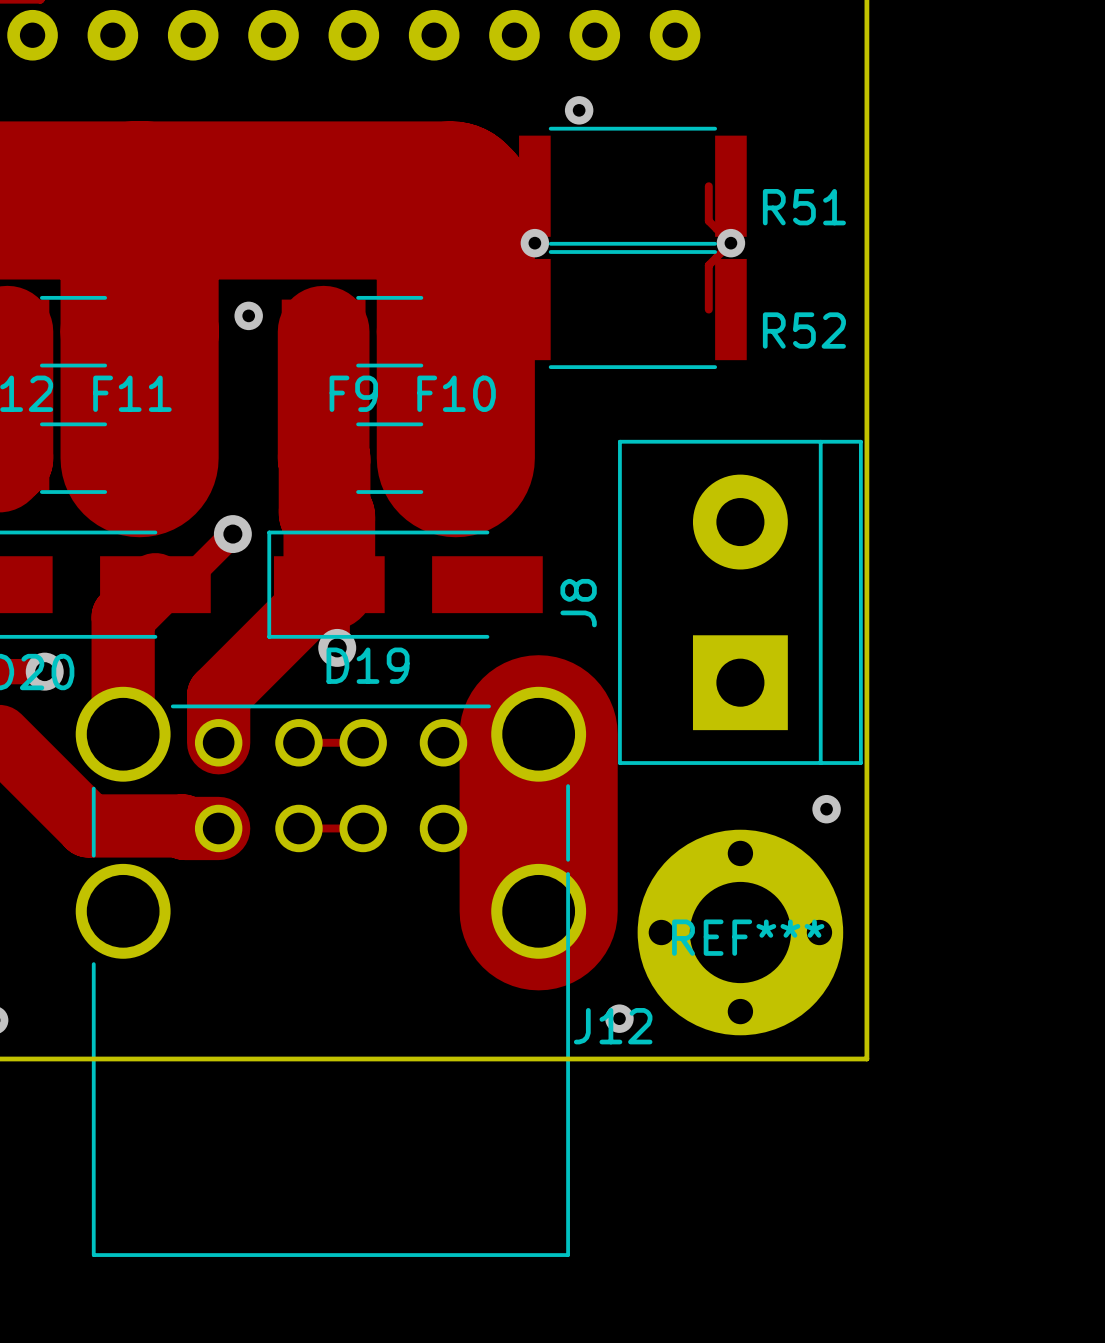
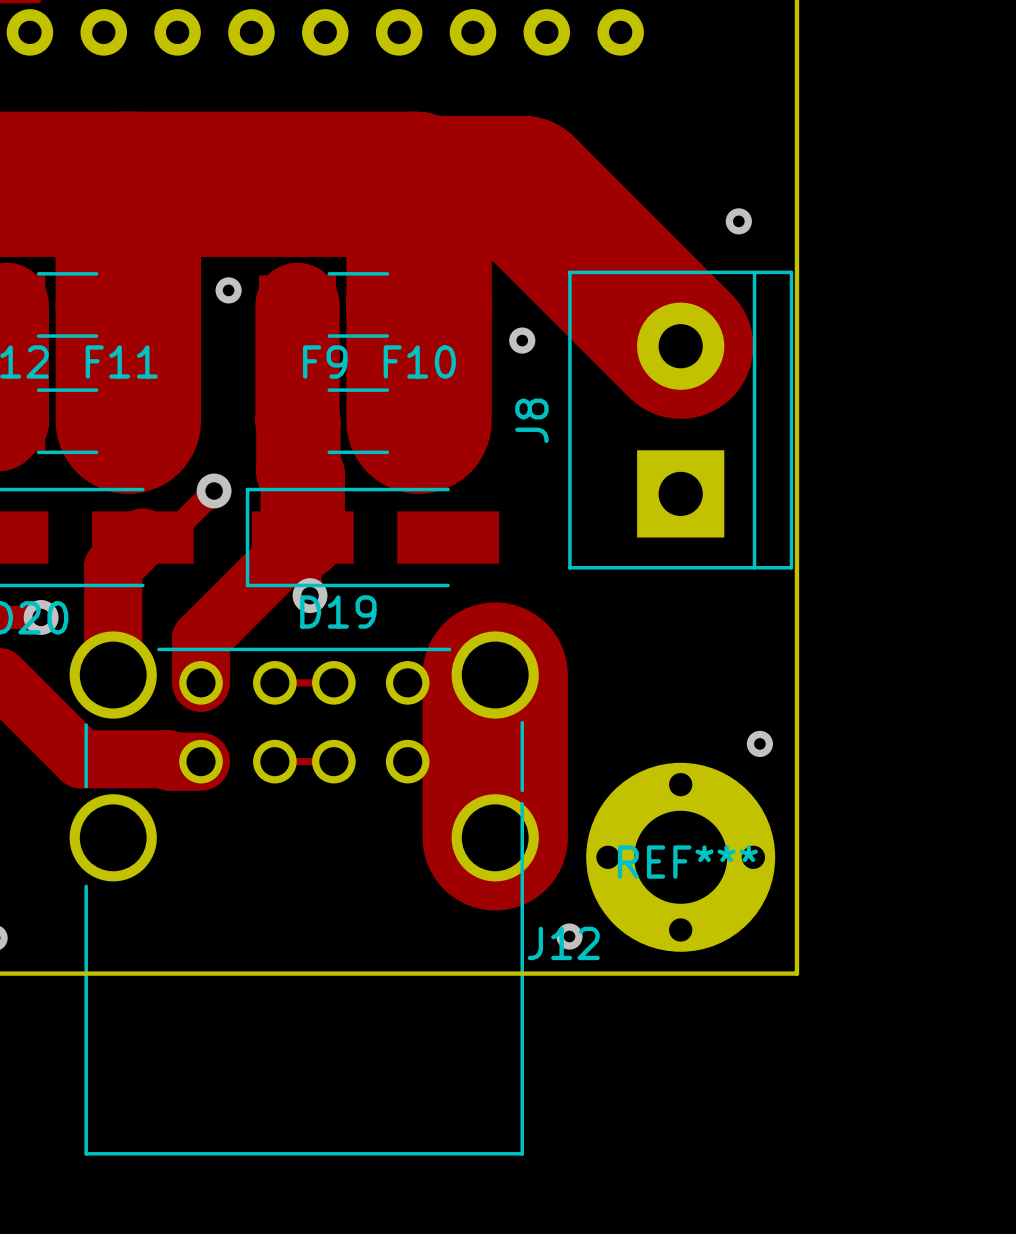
via: (579, 110) -> none
track: (512, 186) (512, 221) (534, 243) (512, 265) (512, 309) -> none
R51: (632, 186) -> none
track: (708, 186) (708, 221) (730, 243) (708, 265) (708, 309) -> none
track: none -> (419, 188) (523, 188) (680, 346)
via: (534, 243) -> none
via position: (730, 243) -> (738, 221)
R52: (632, 309) -> none
via: none -> (522, 340)
J8 position: (740, 602) -> (680, 420)

